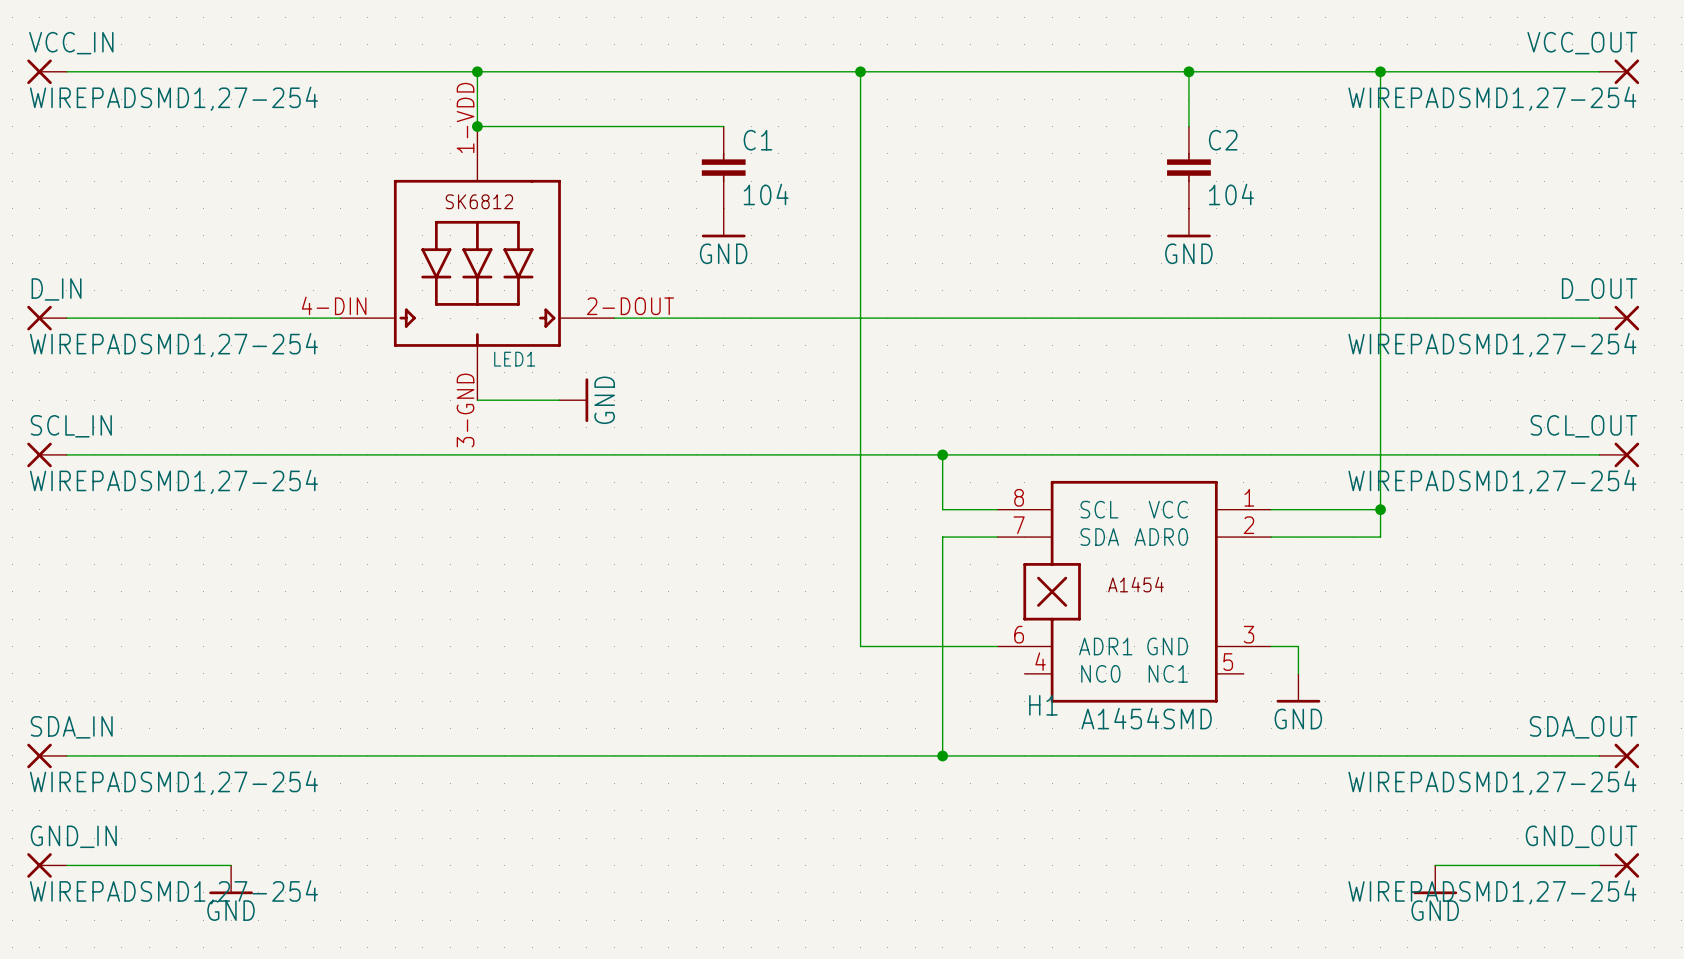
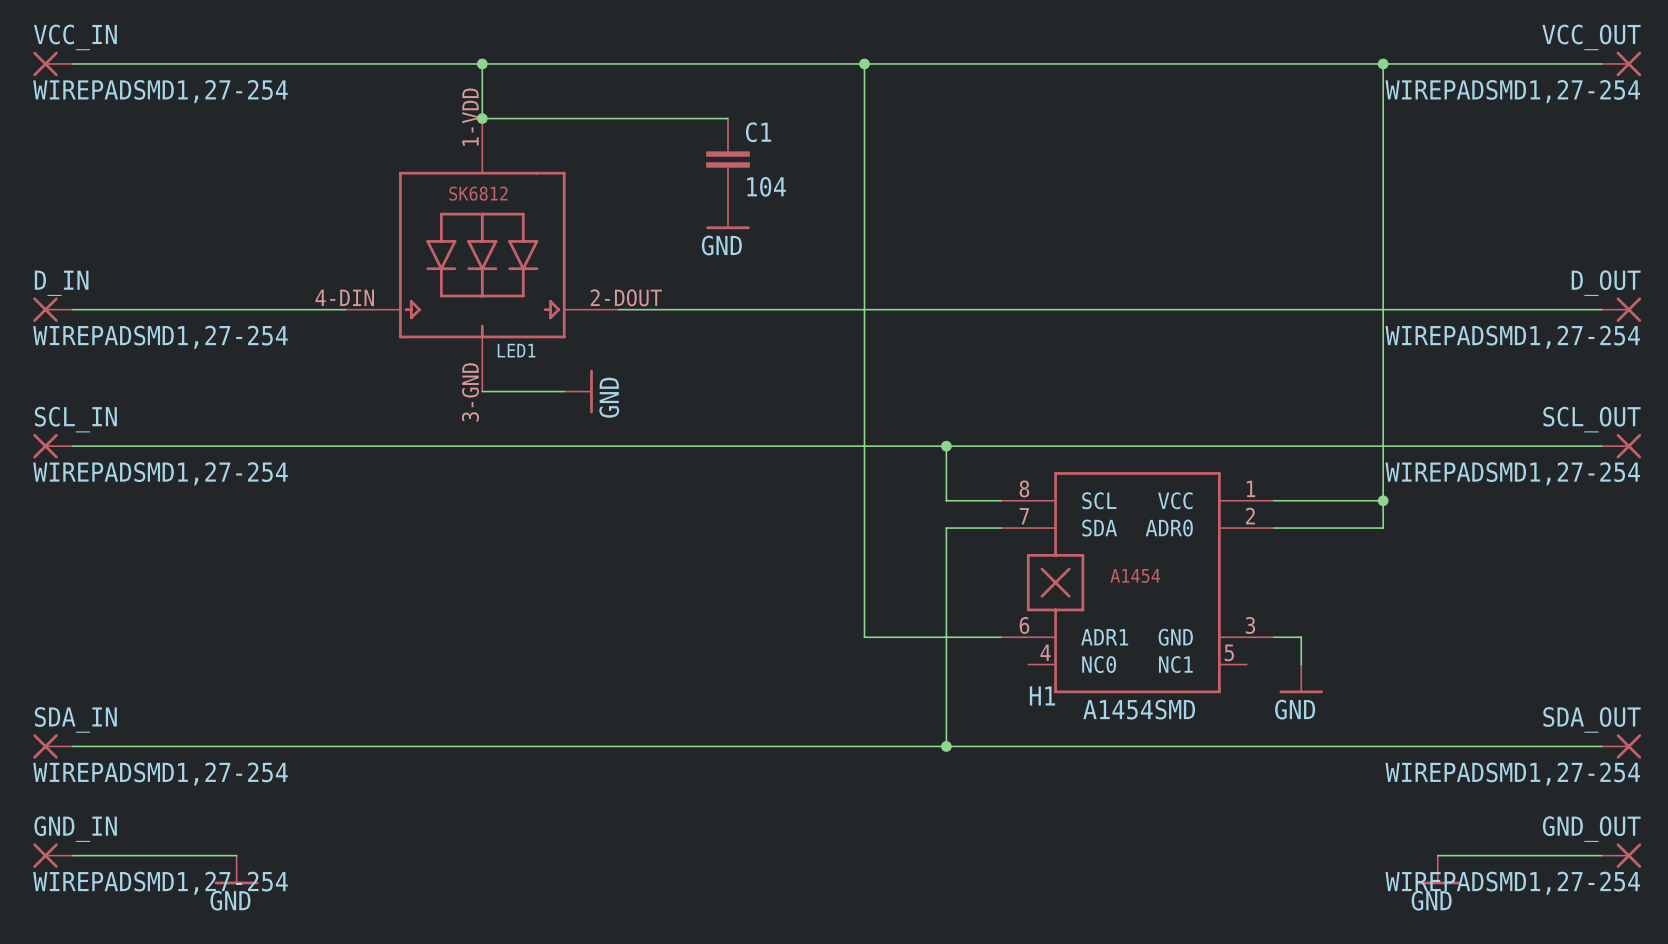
wire: (1188, 71) (1188, 126) -> none
junction: (1188, 71) -> none
C2: 104 (1188, 167) -> none
power symbol: GND (1188, 222) -> none

